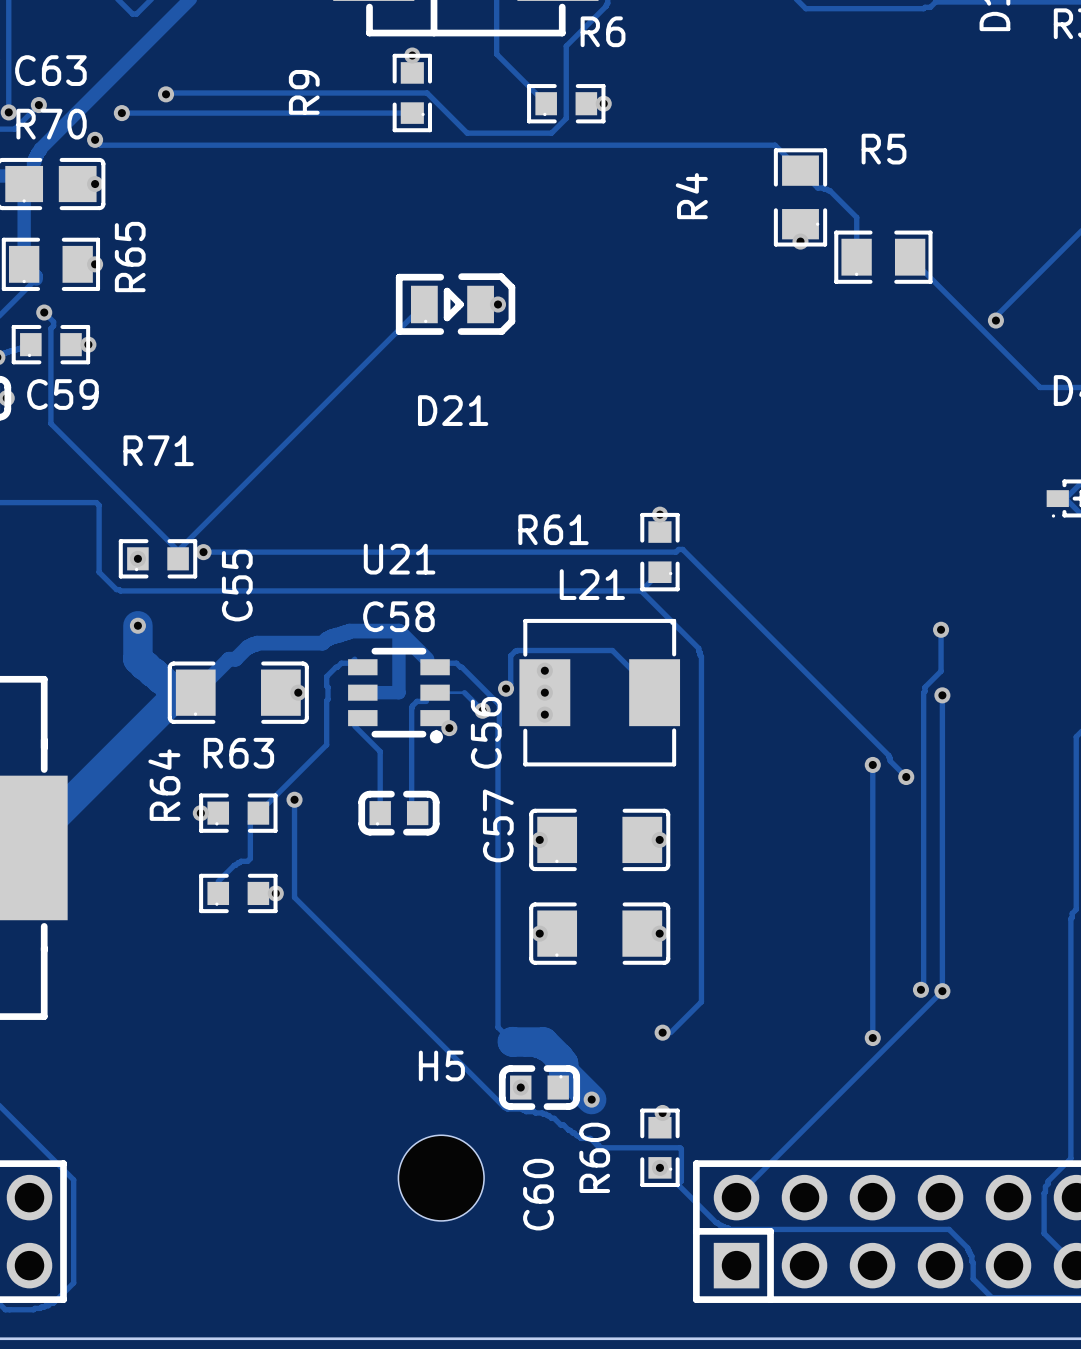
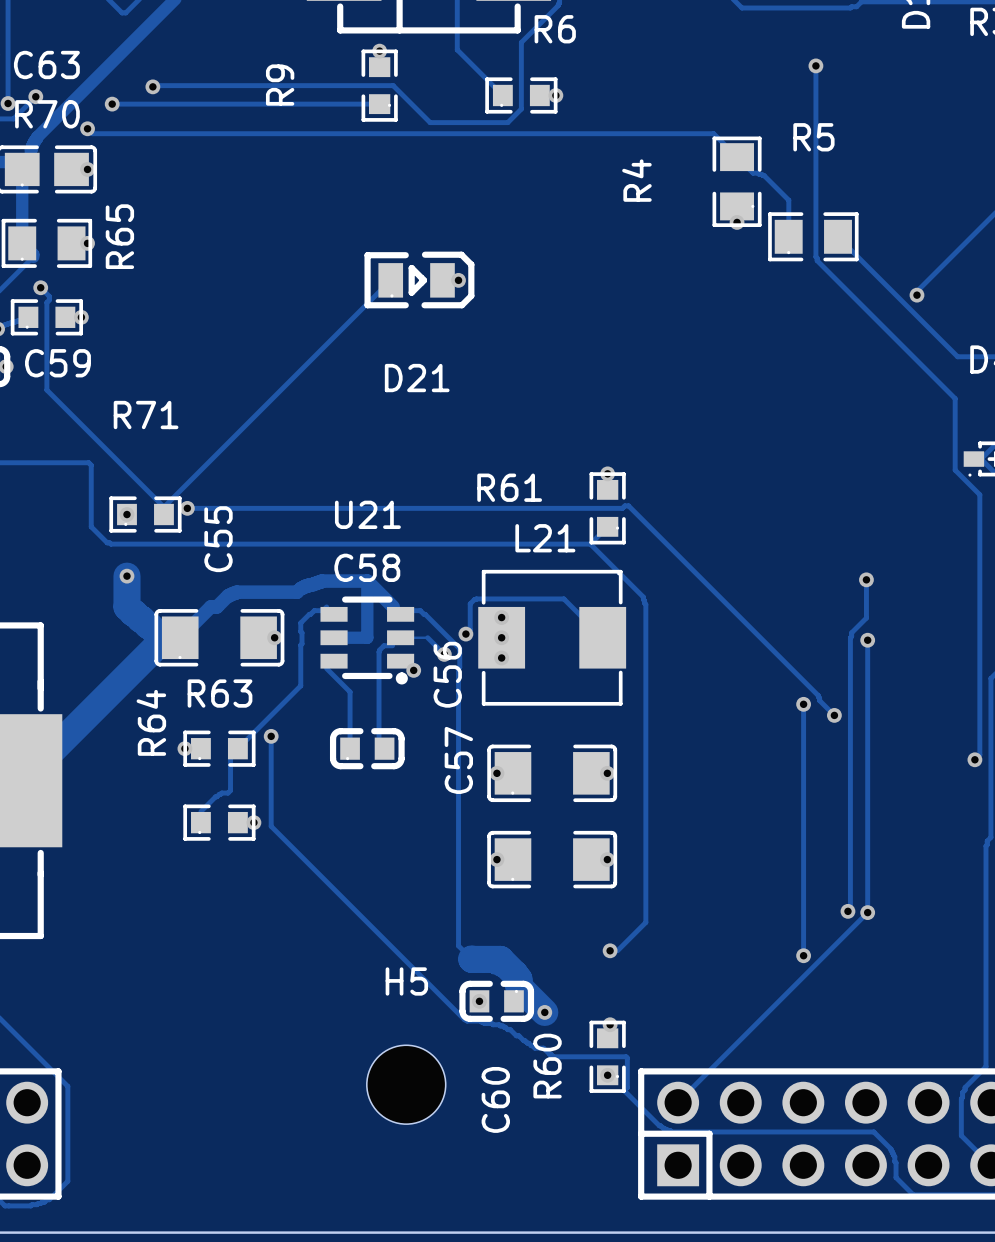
track: none -> (815, 65) (817, 260) (955, 398) (955, 470) (979, 494) (979, 754) (974, 759)
via: none -> (815, 65)
via: none -> (974, 759)

